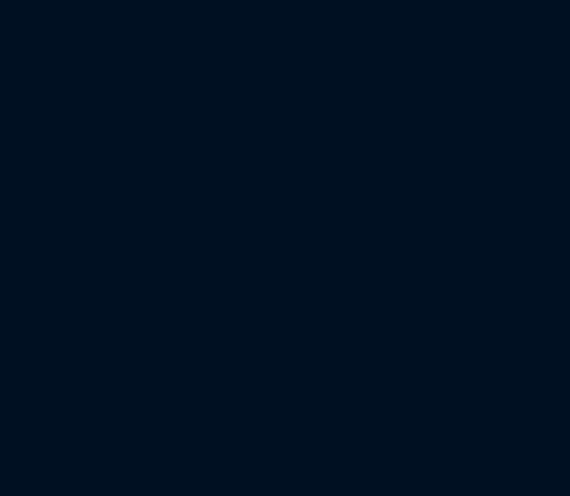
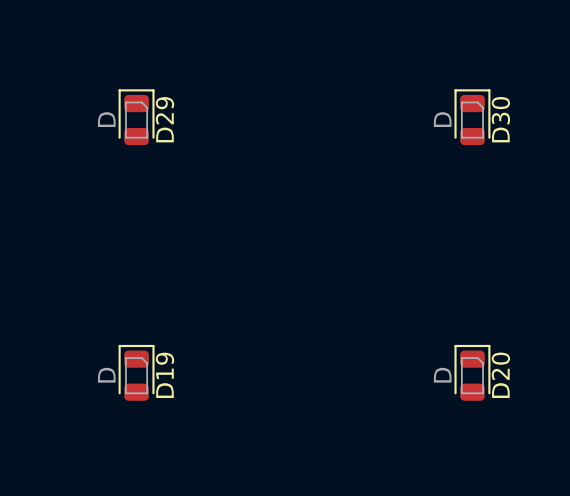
D29: none -> D (136, 117)
D30: none -> D (472, 117)
D19: none -> D (136, 372)
D20: none -> D (472, 372)

